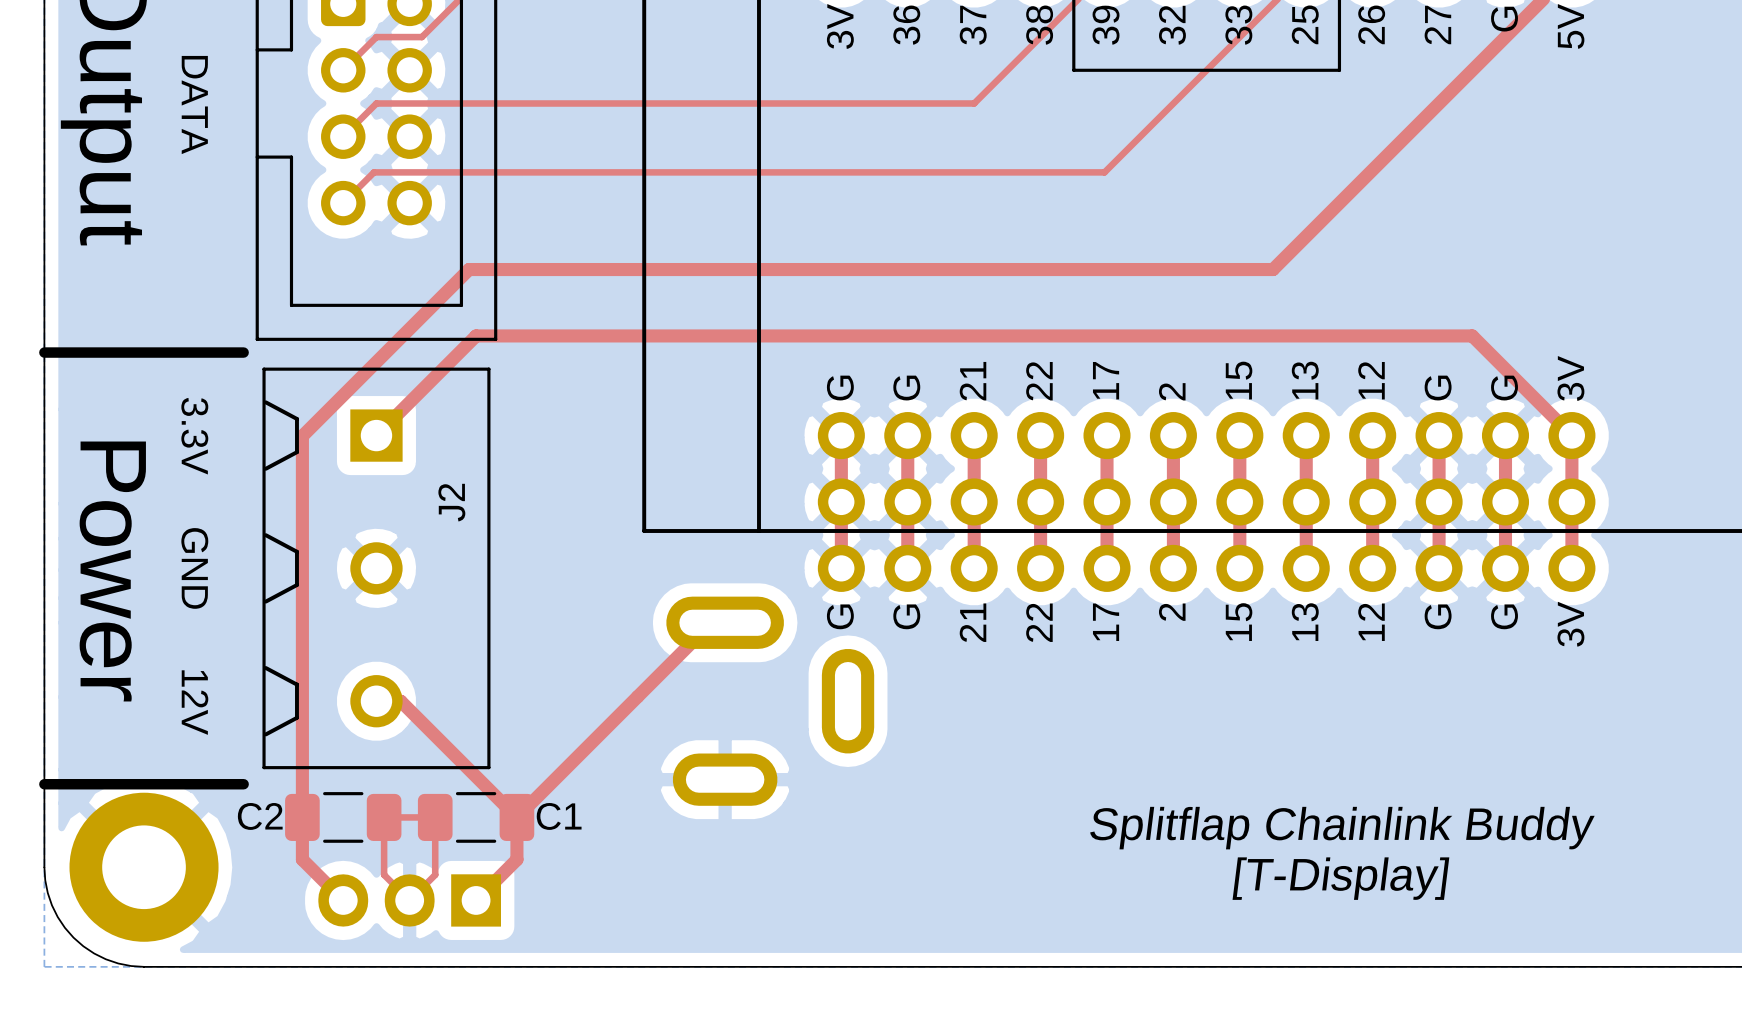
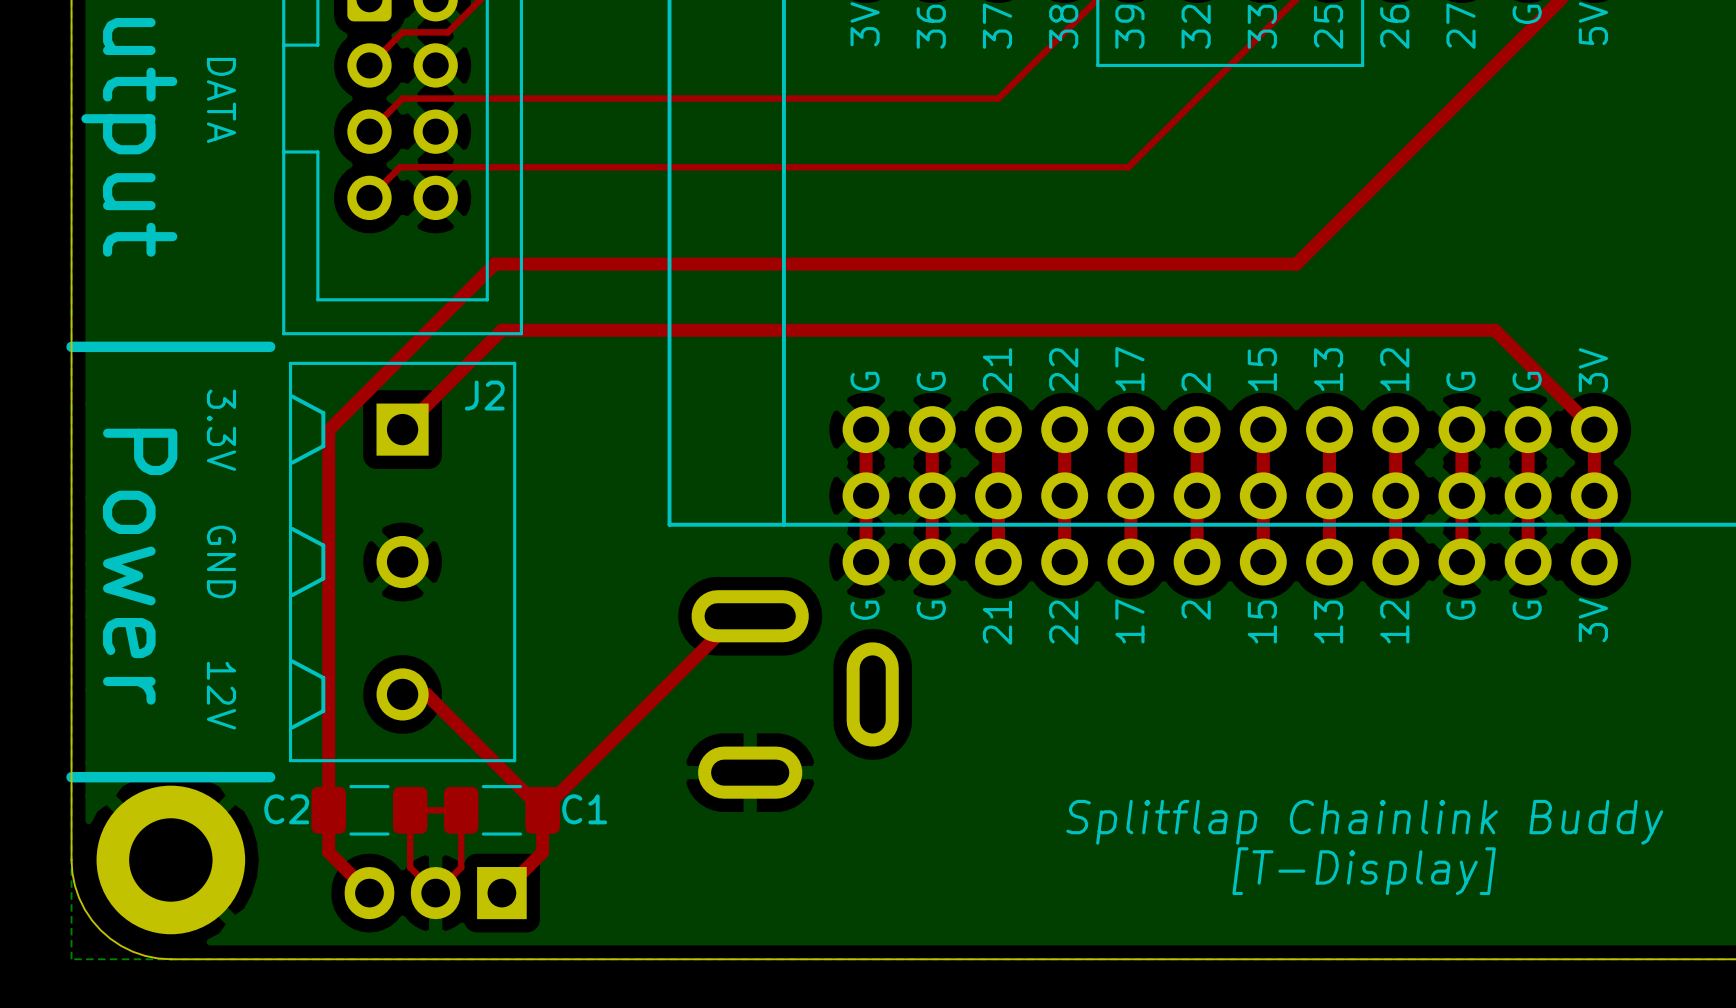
J2 name rotation: 0° (451, 502) -> 90° clockwise (484, 395)
J2 name position: J2 (451, 502) -> J2 (484, 395)

